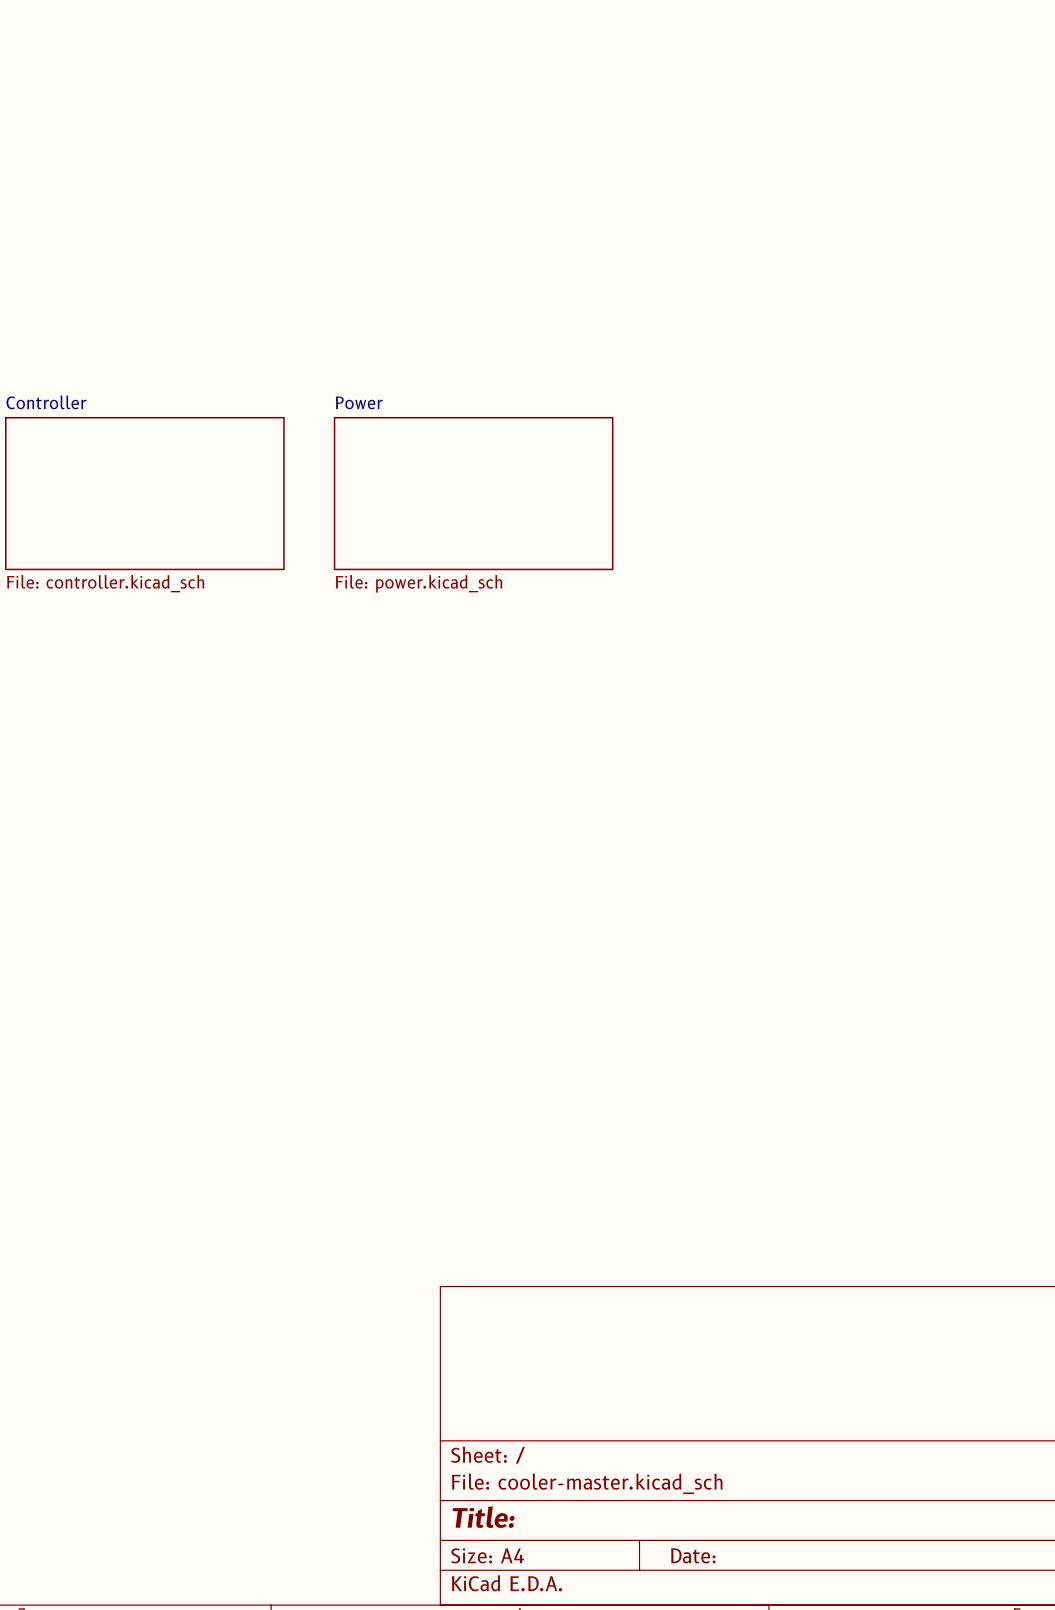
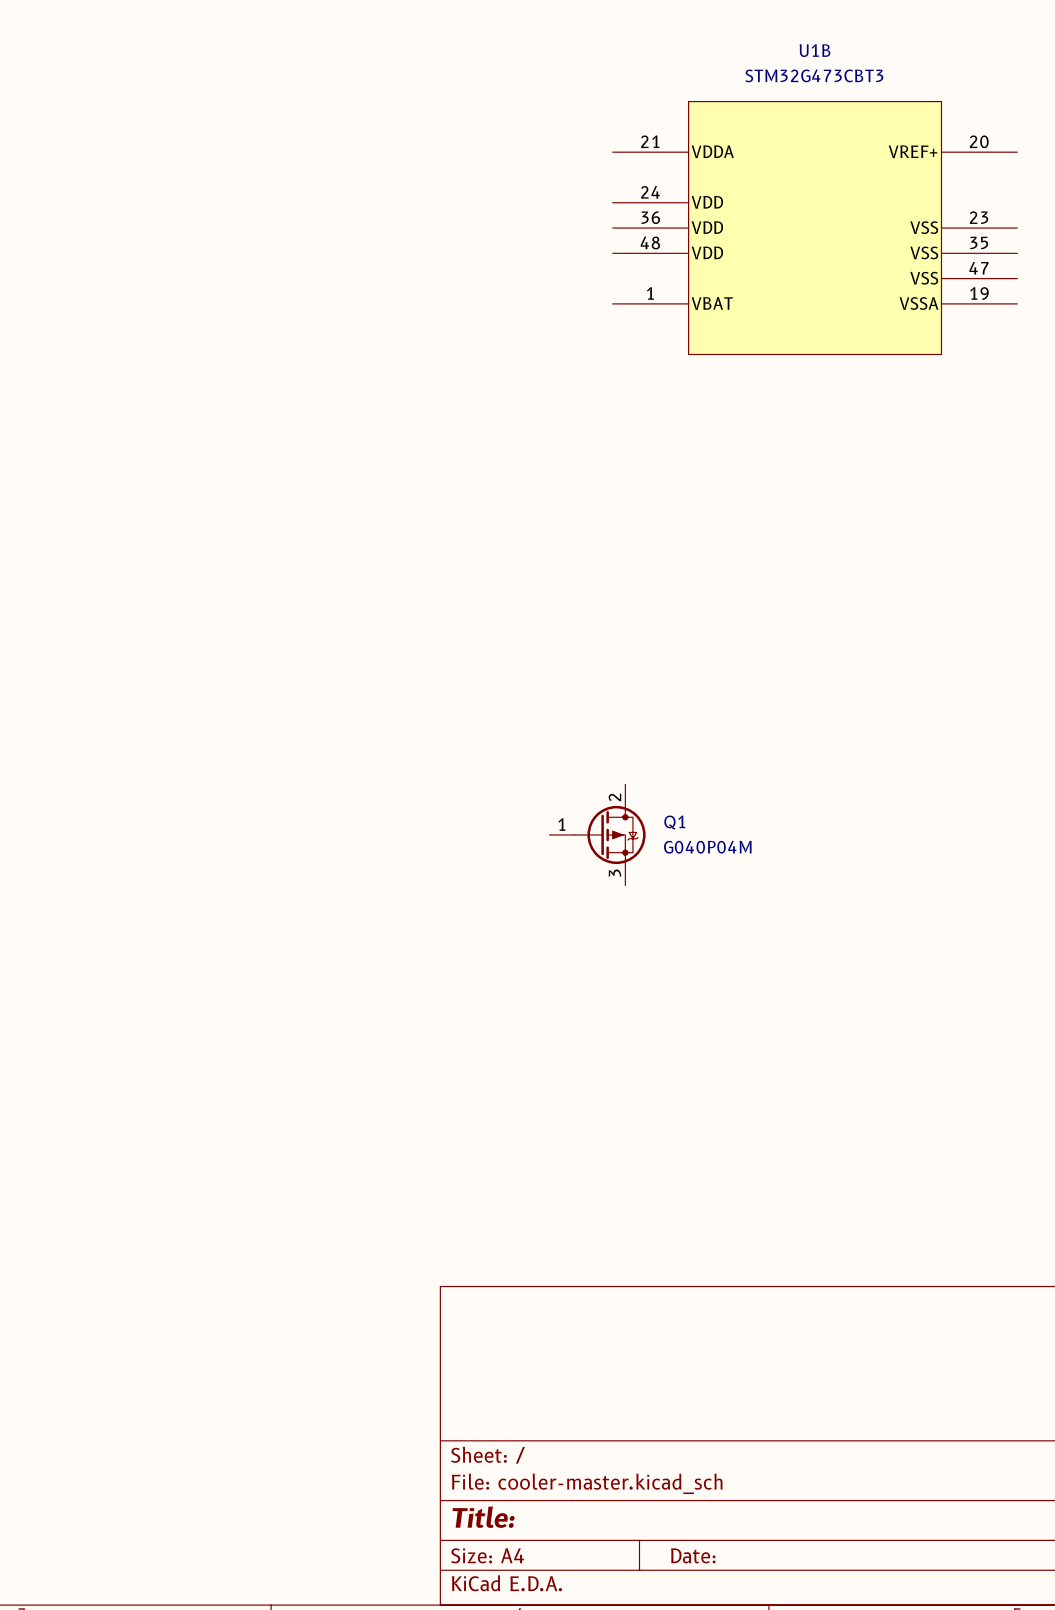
U1B: none -> STM32G473CBT3 (815, 228)
sheet Controller: File: controller.kicad_sch (144, 493) -> none
sheet Power: File: power.kicad_sch (473, 493) -> none
Q1: none -> G040P04M (597, 834)

